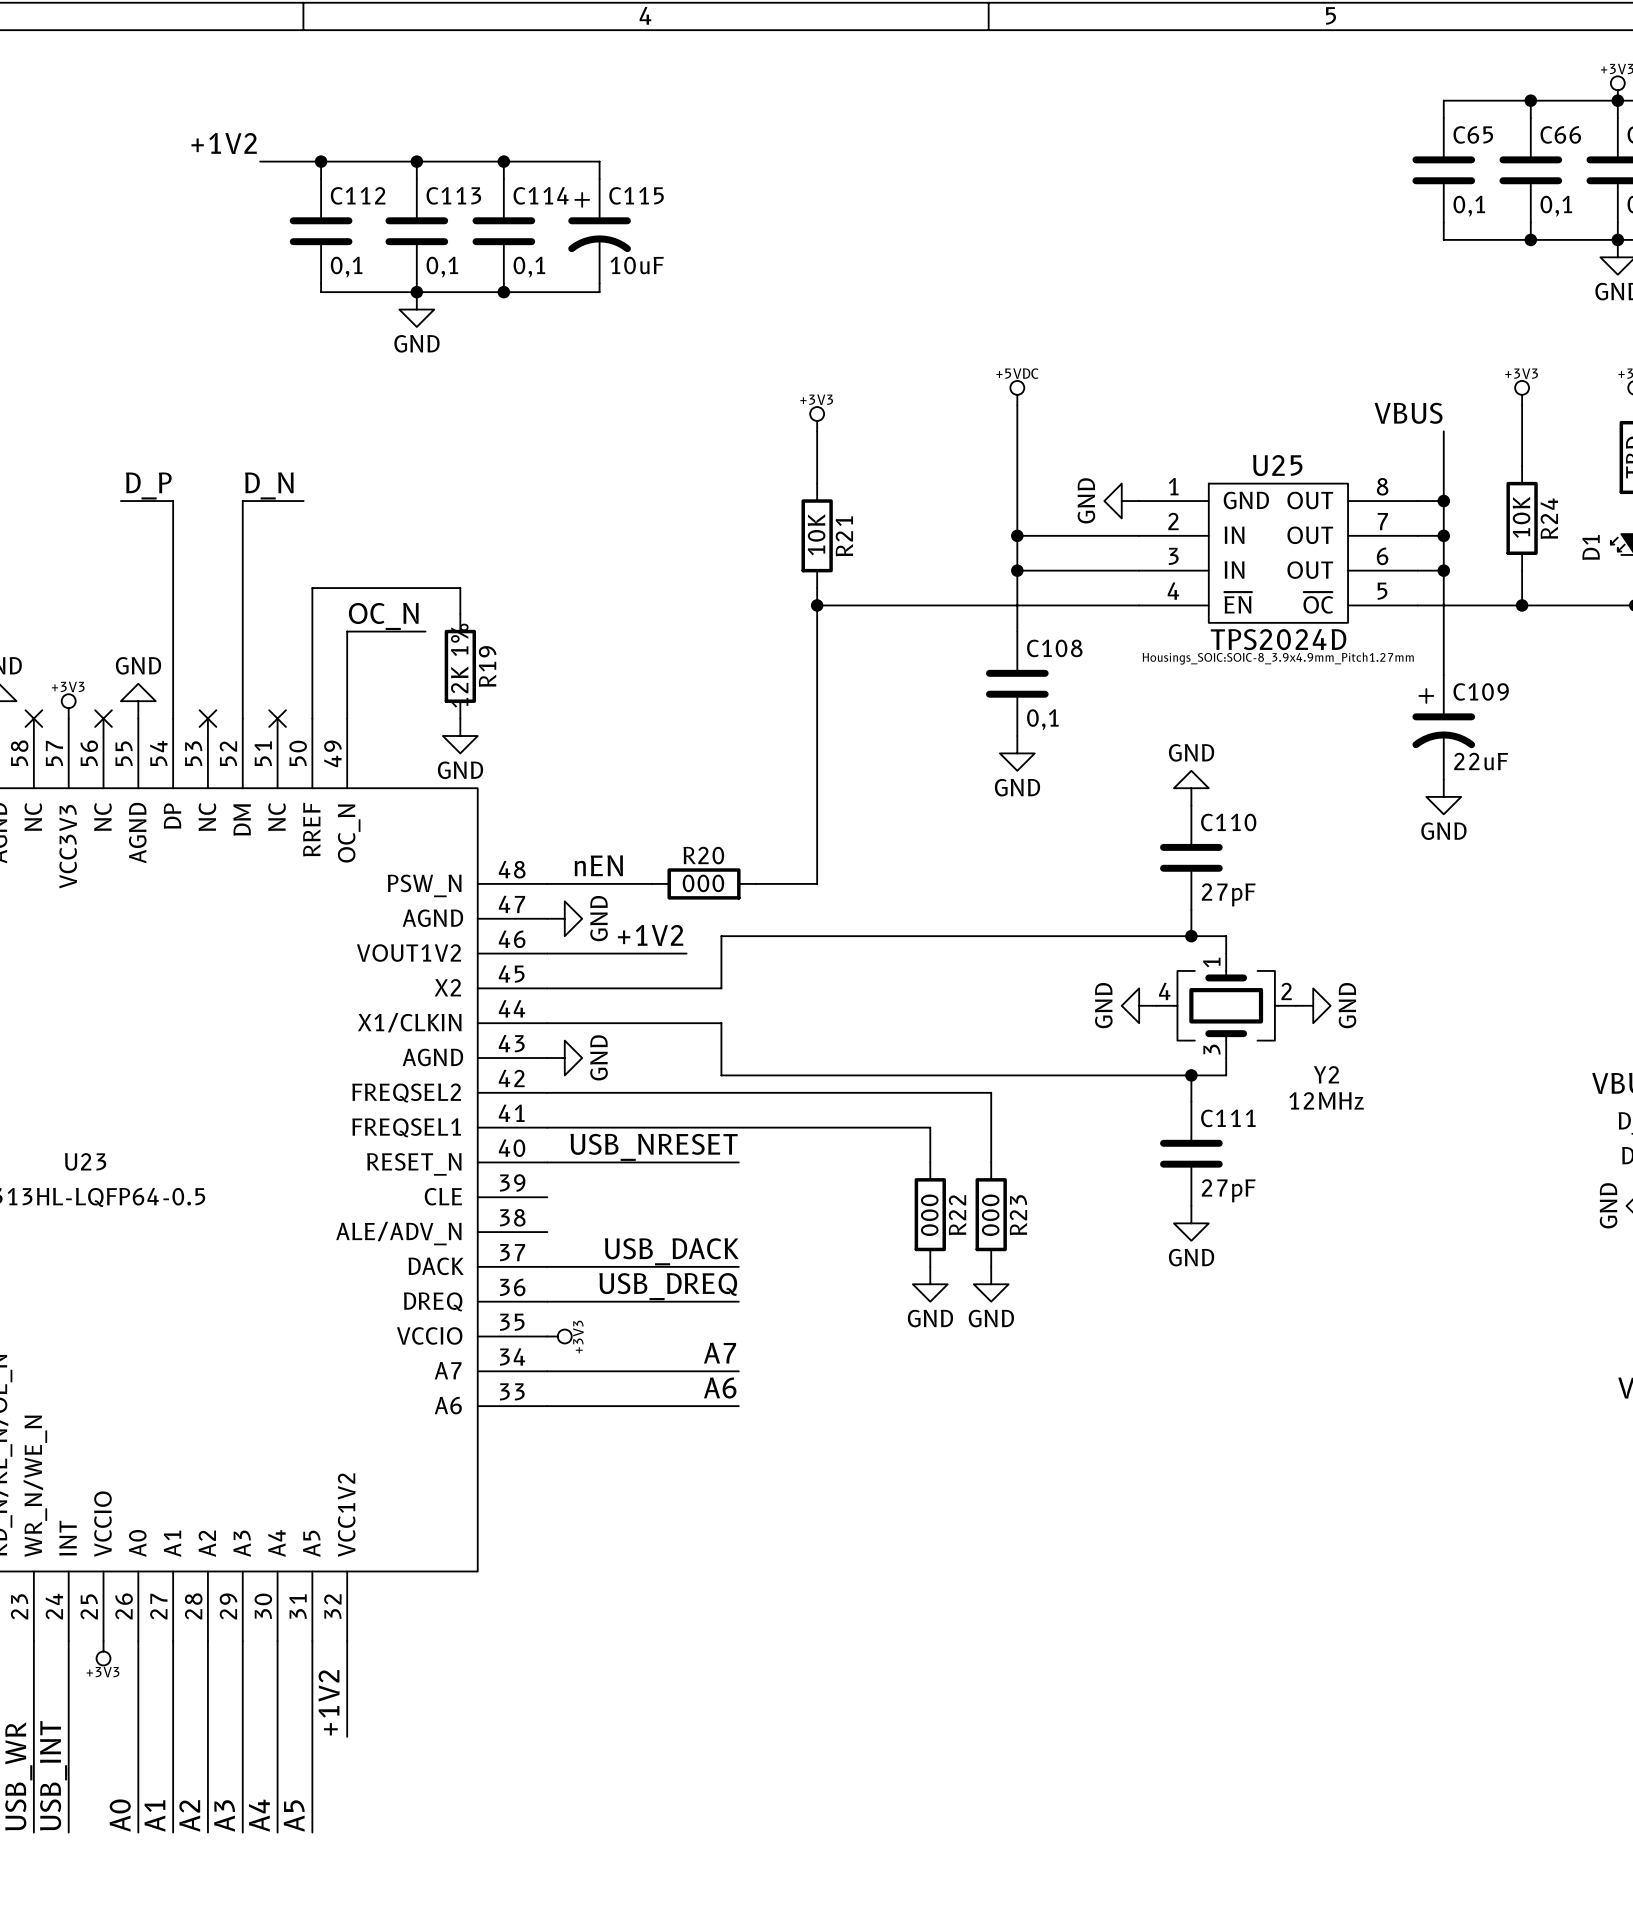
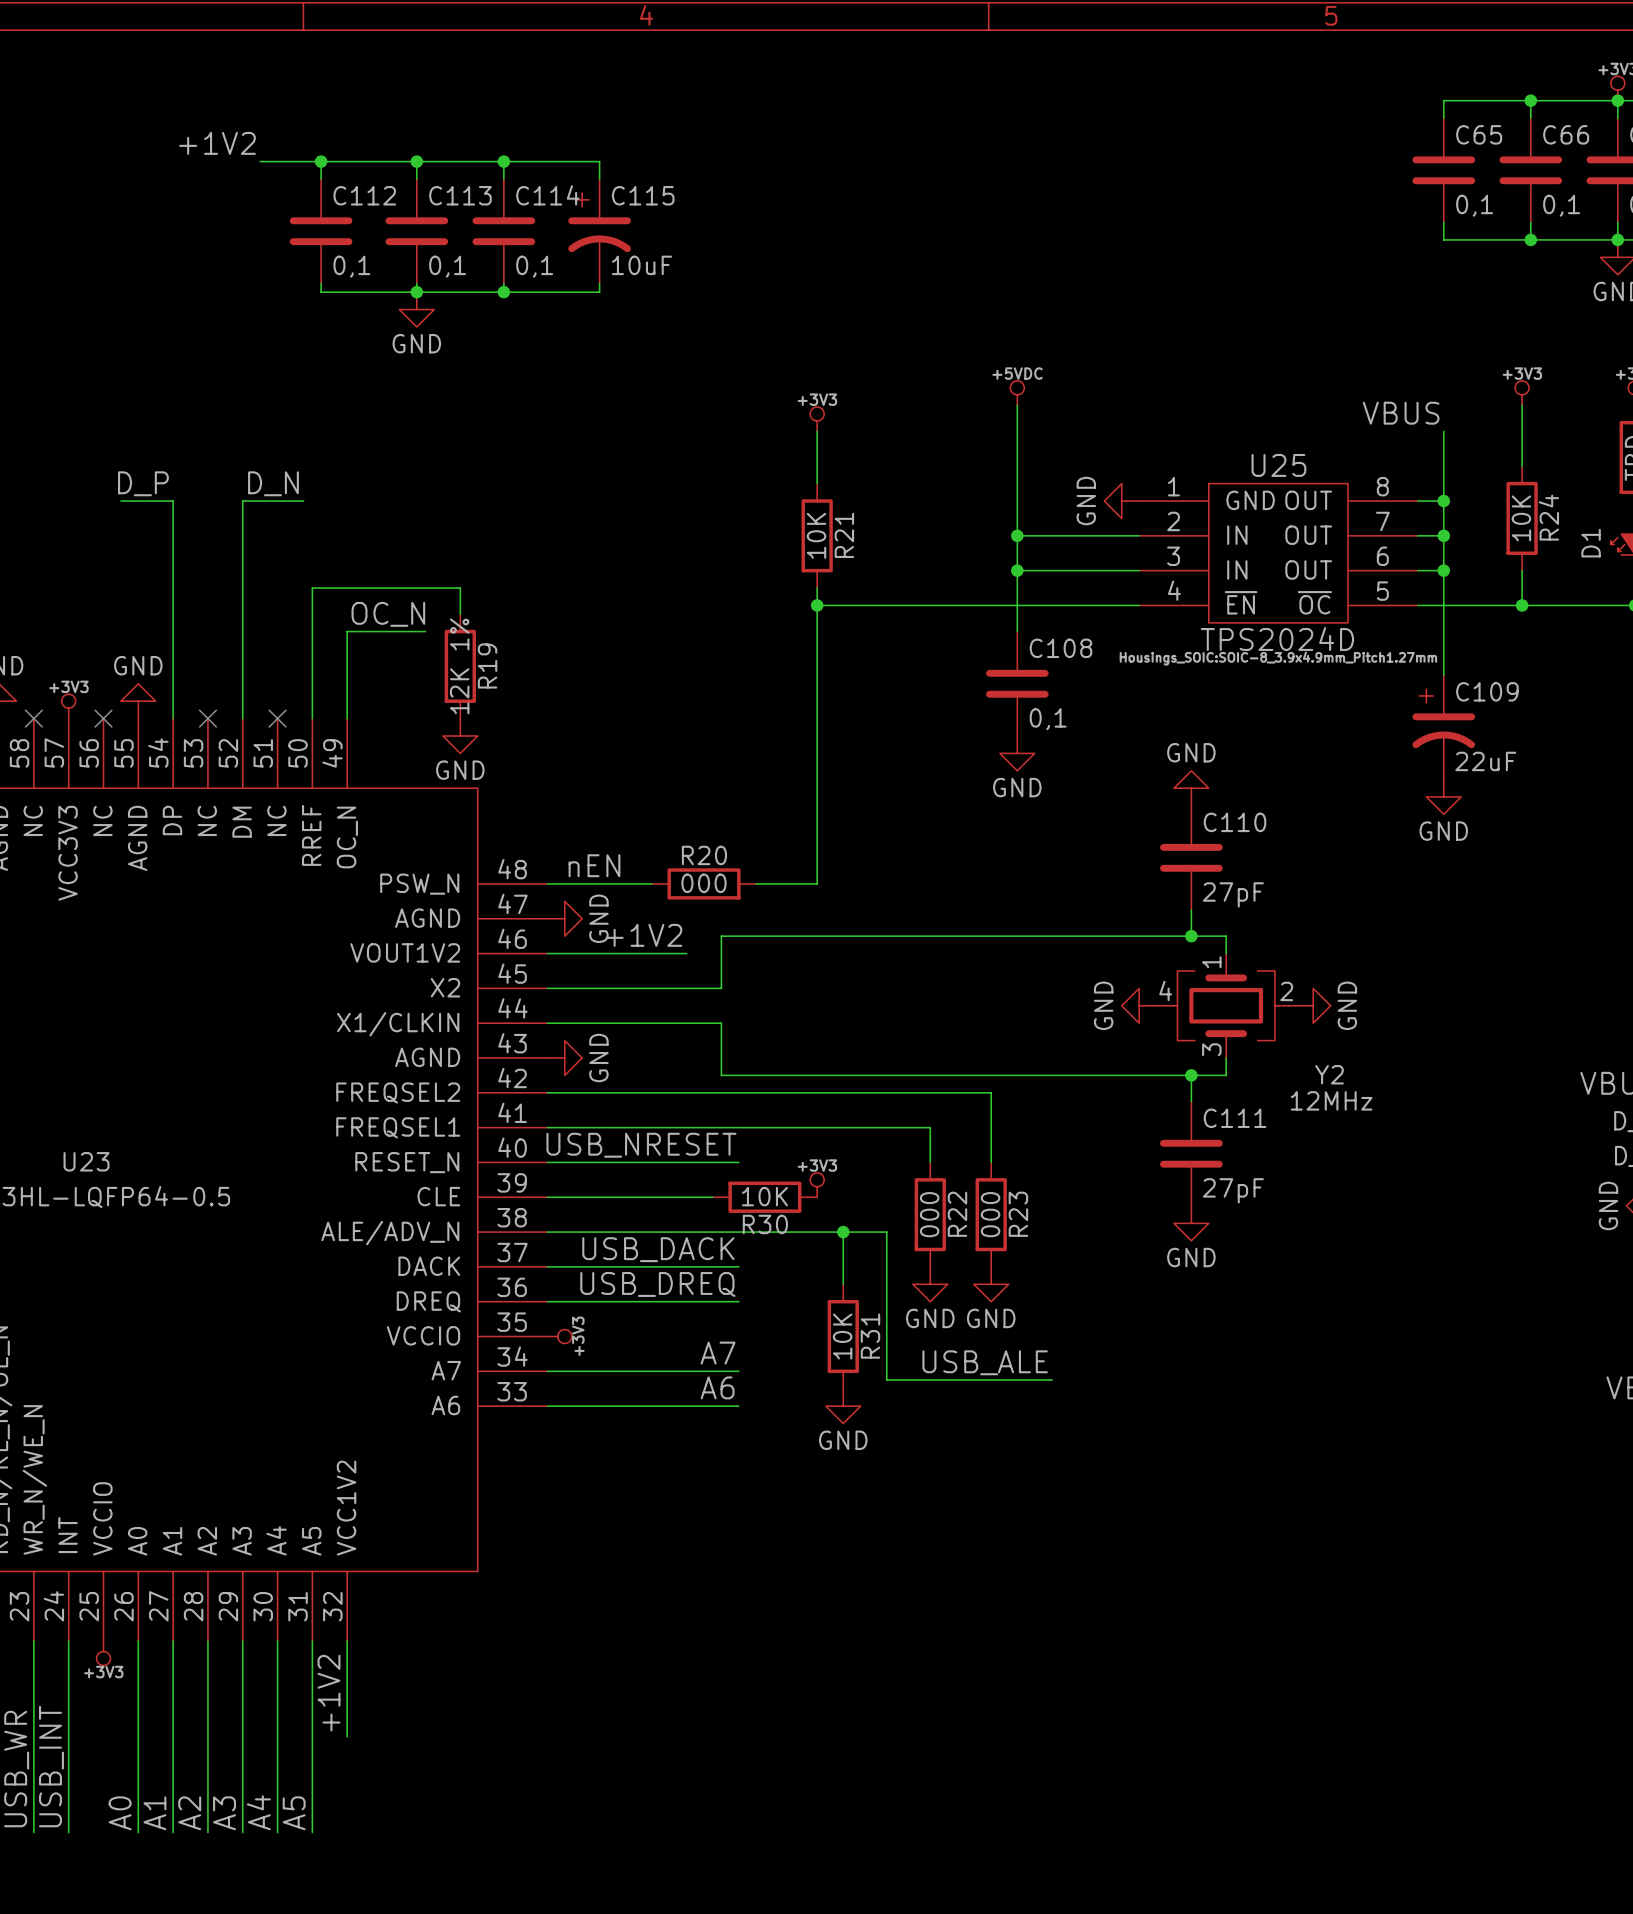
power symbol: none -> +3V3 (817, 1185)
wire: none -> (547, 1197) (712, 1197)
R30: none -> 10K (764, 1197)
wire: none -> (547, 1232) (886, 1232) (886, 1380) (1052, 1380)
wire: none -> (843, 1232) (843, 1284)
junction: none -> (843, 1232)
R31: none -> 10K (843, 1336)
label: none -> USB_ALE (985, 1362)
power symbol: none -> GND (843, 1406)

